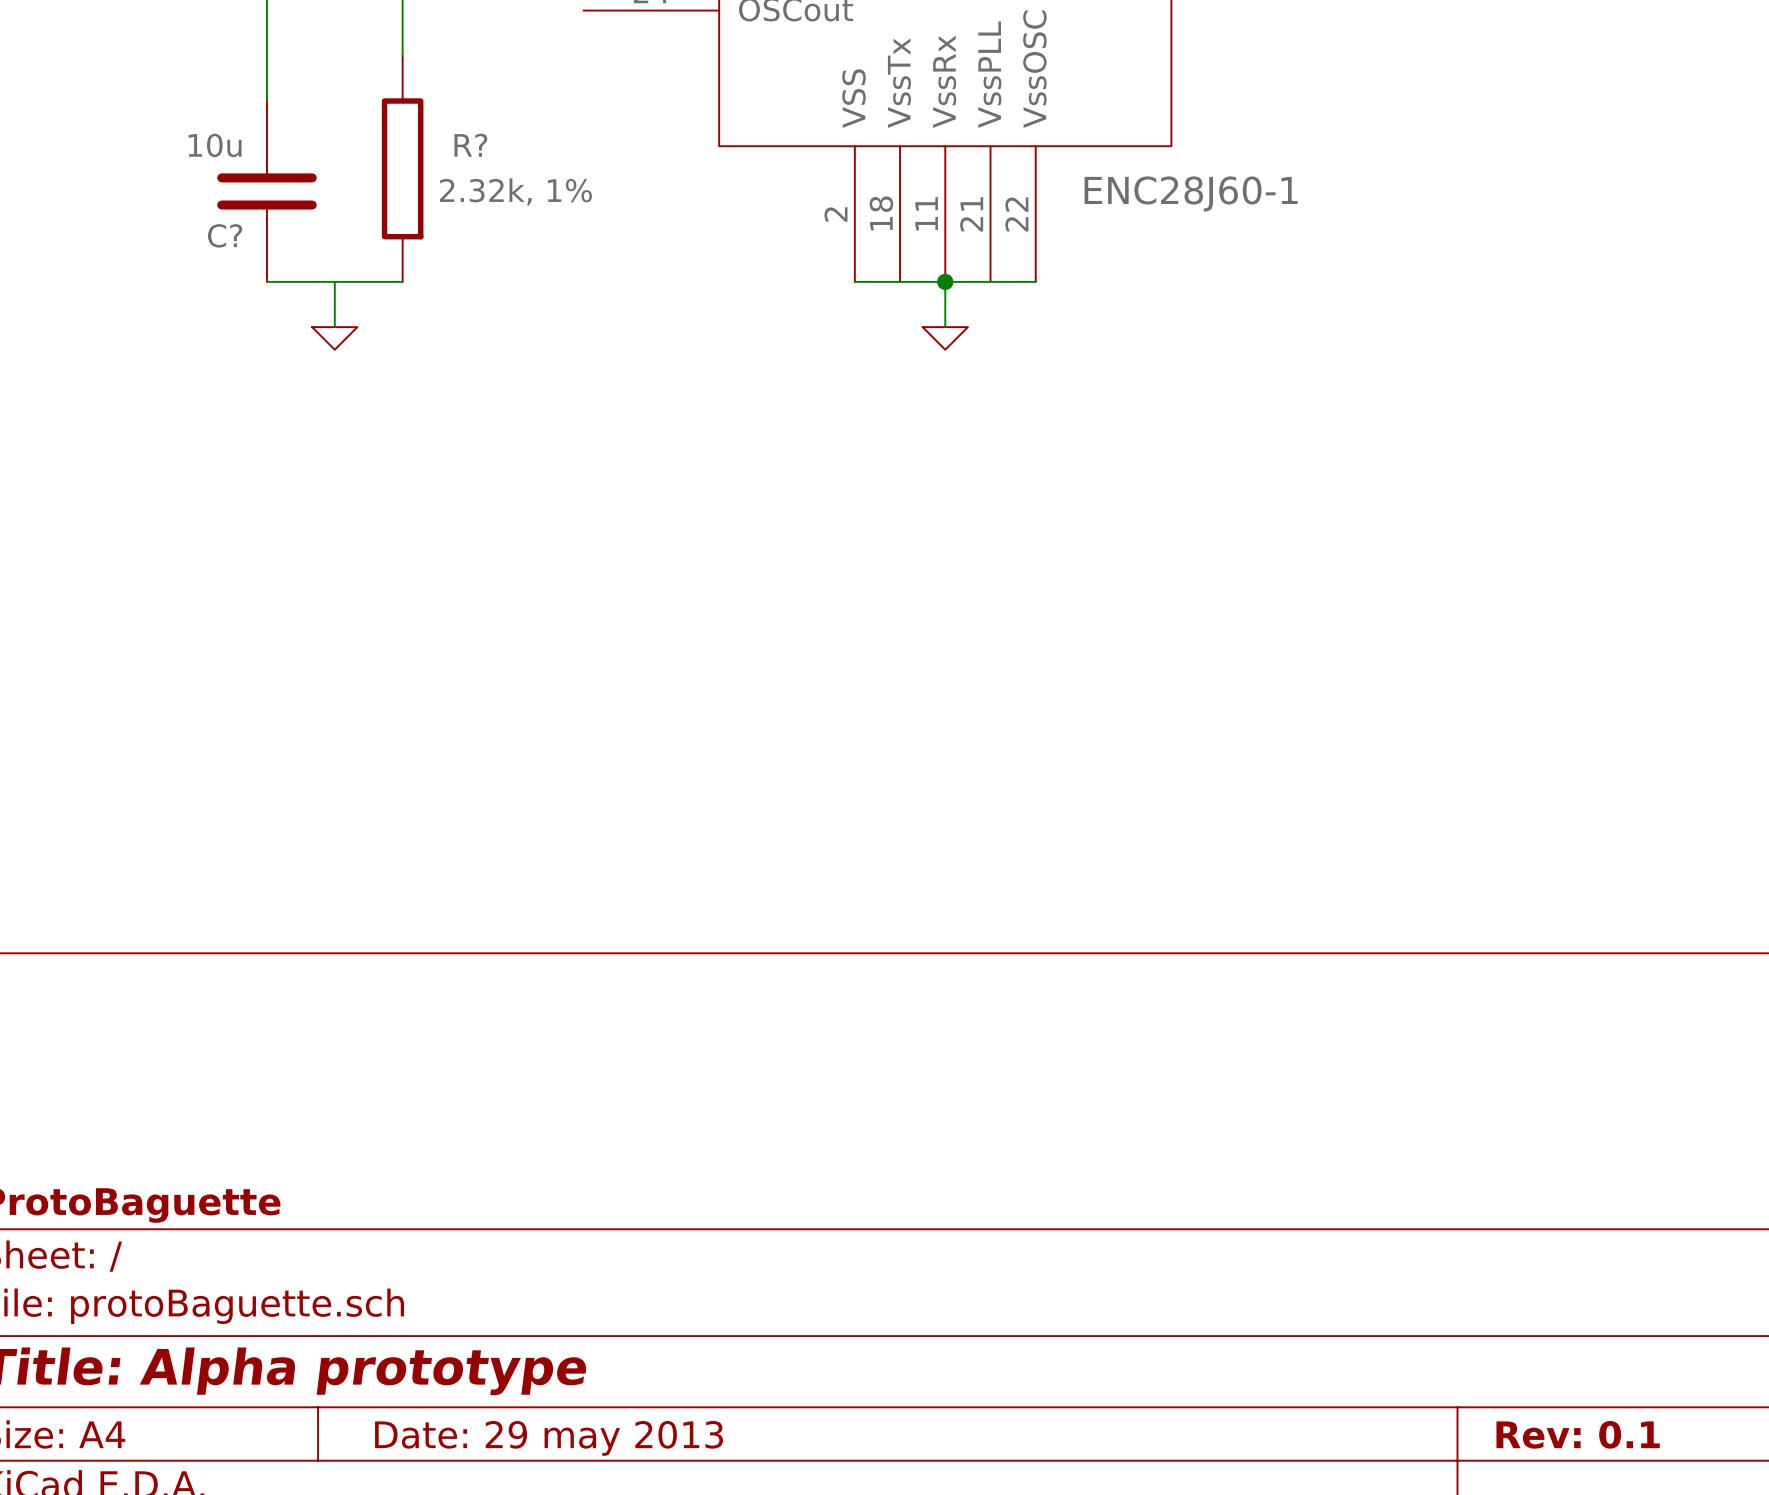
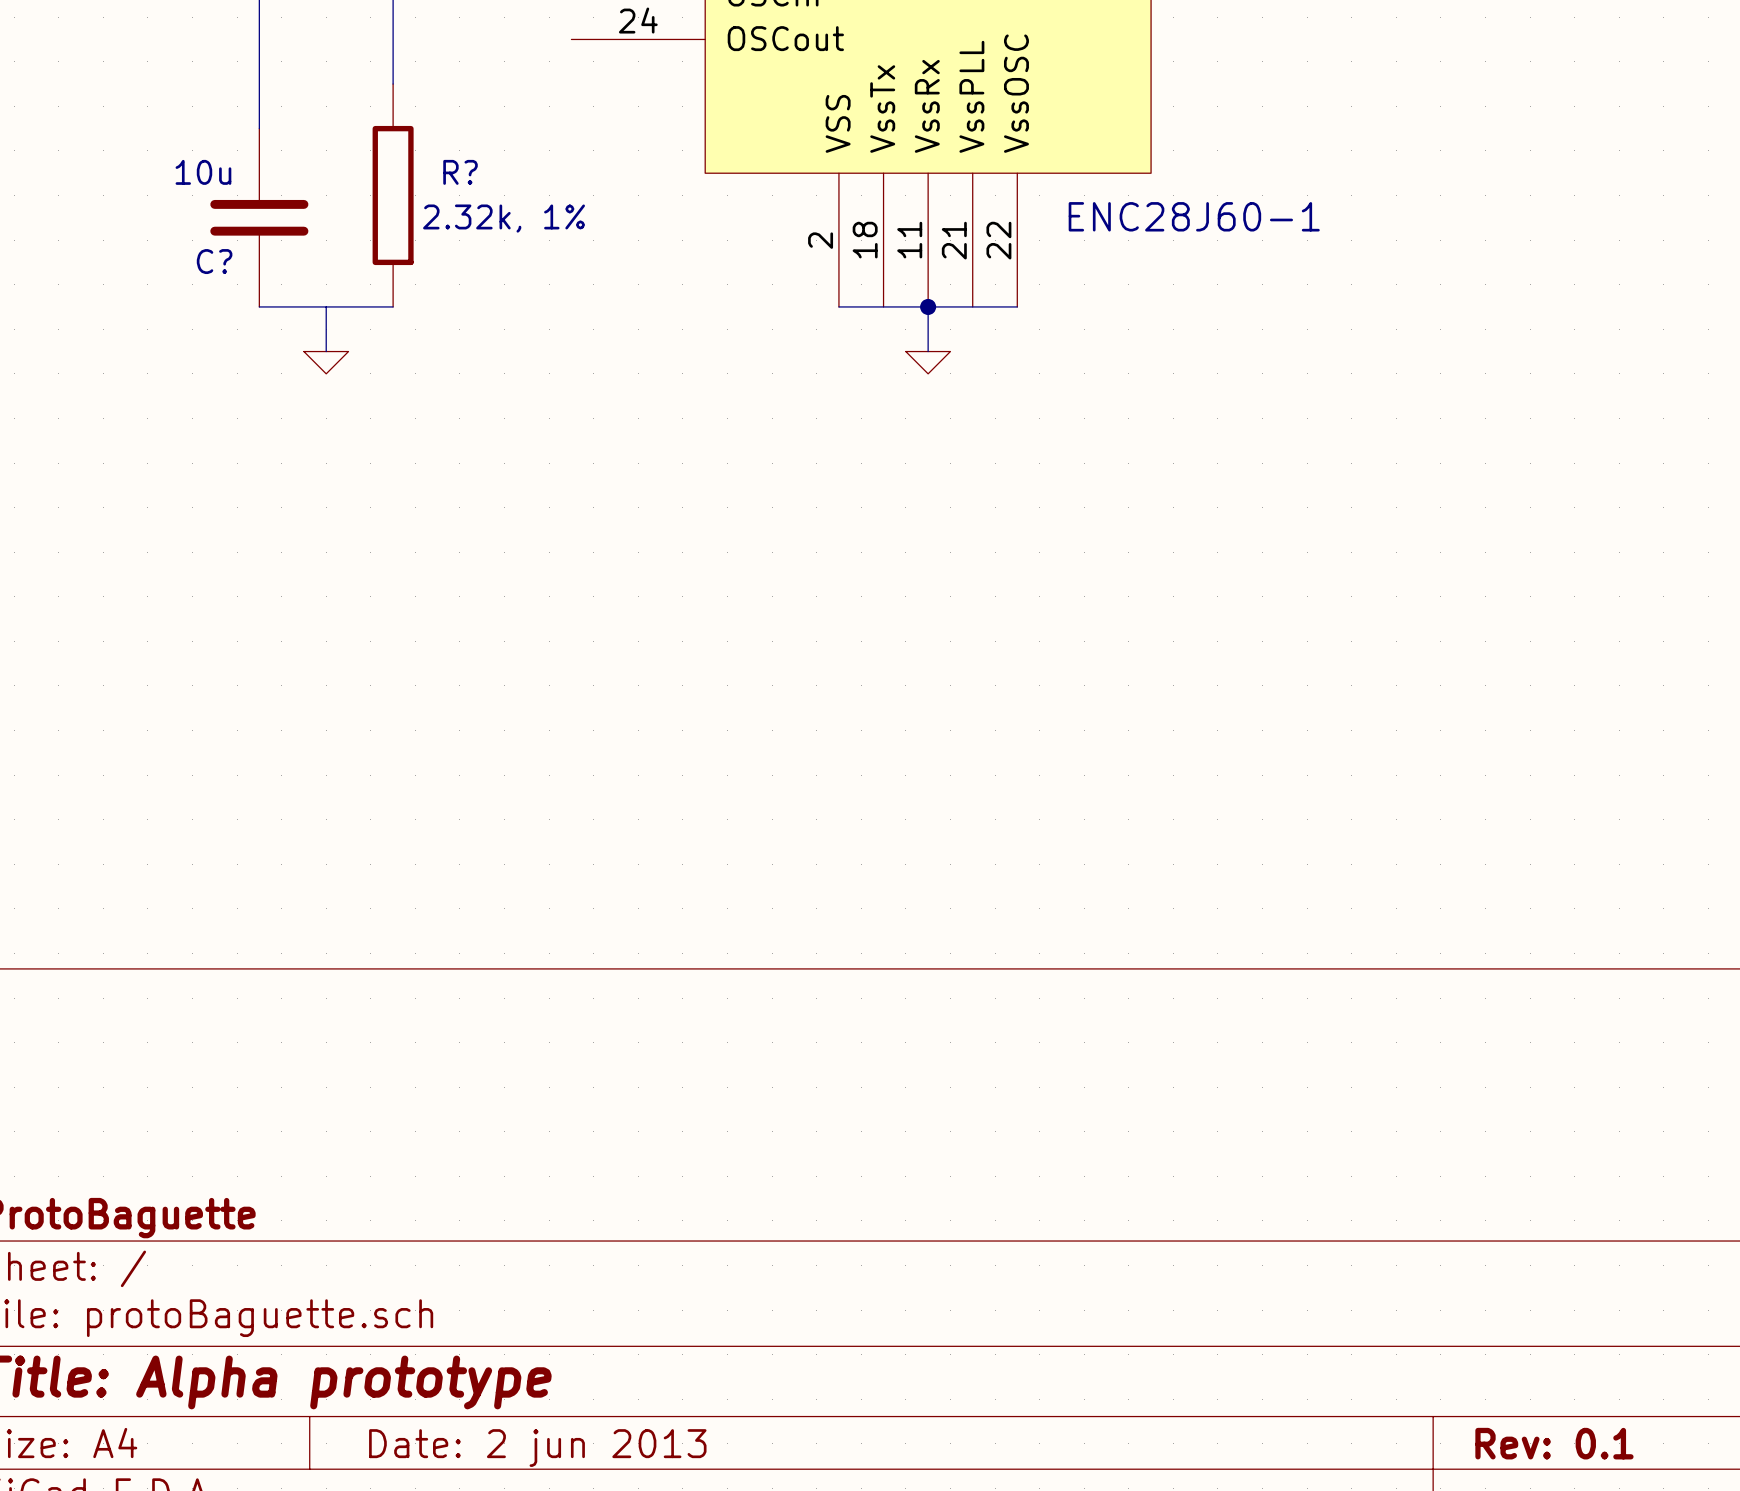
title block: Date: 29 may 2013 (549, 1438) -> Date: 2 jun 2013 (537, 1448)

